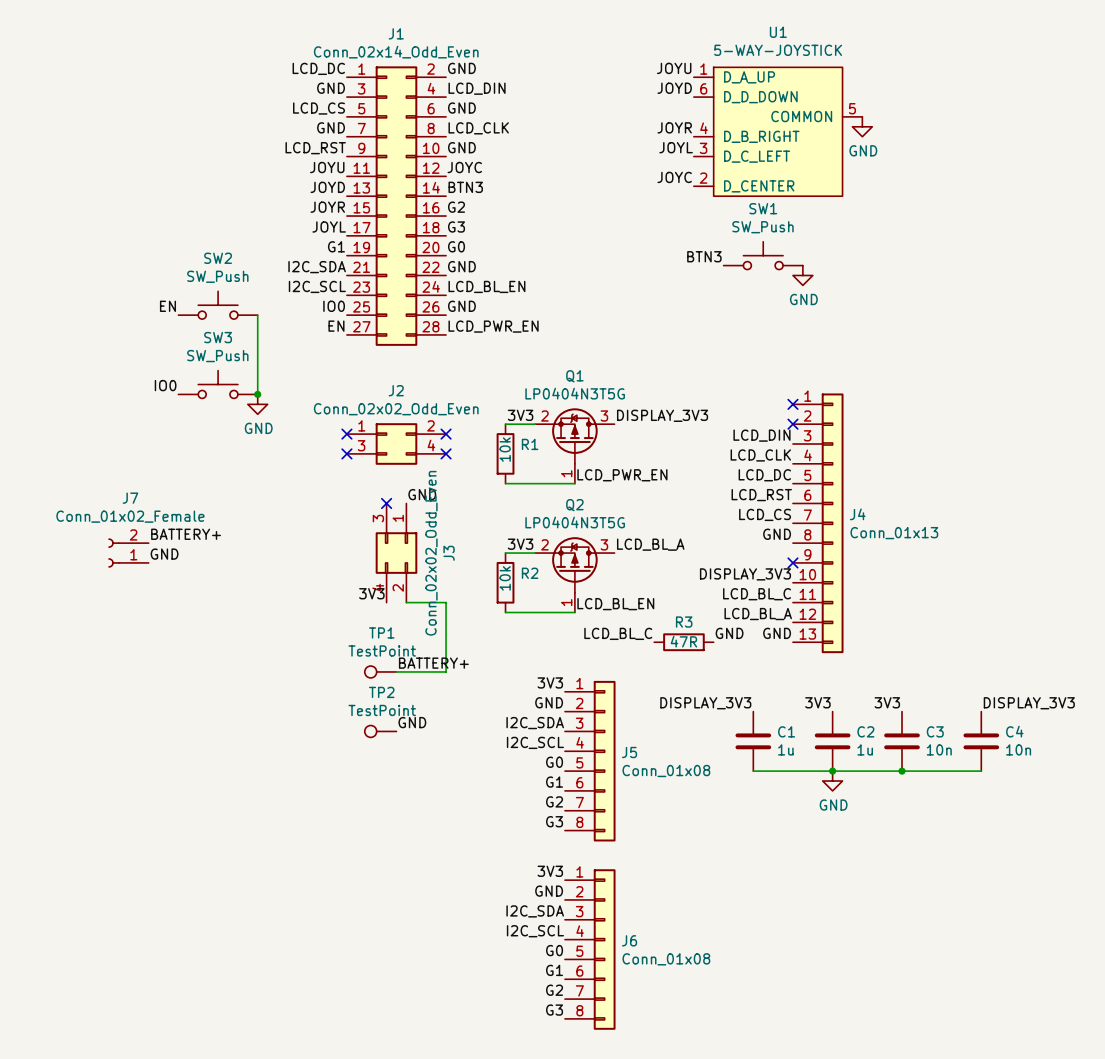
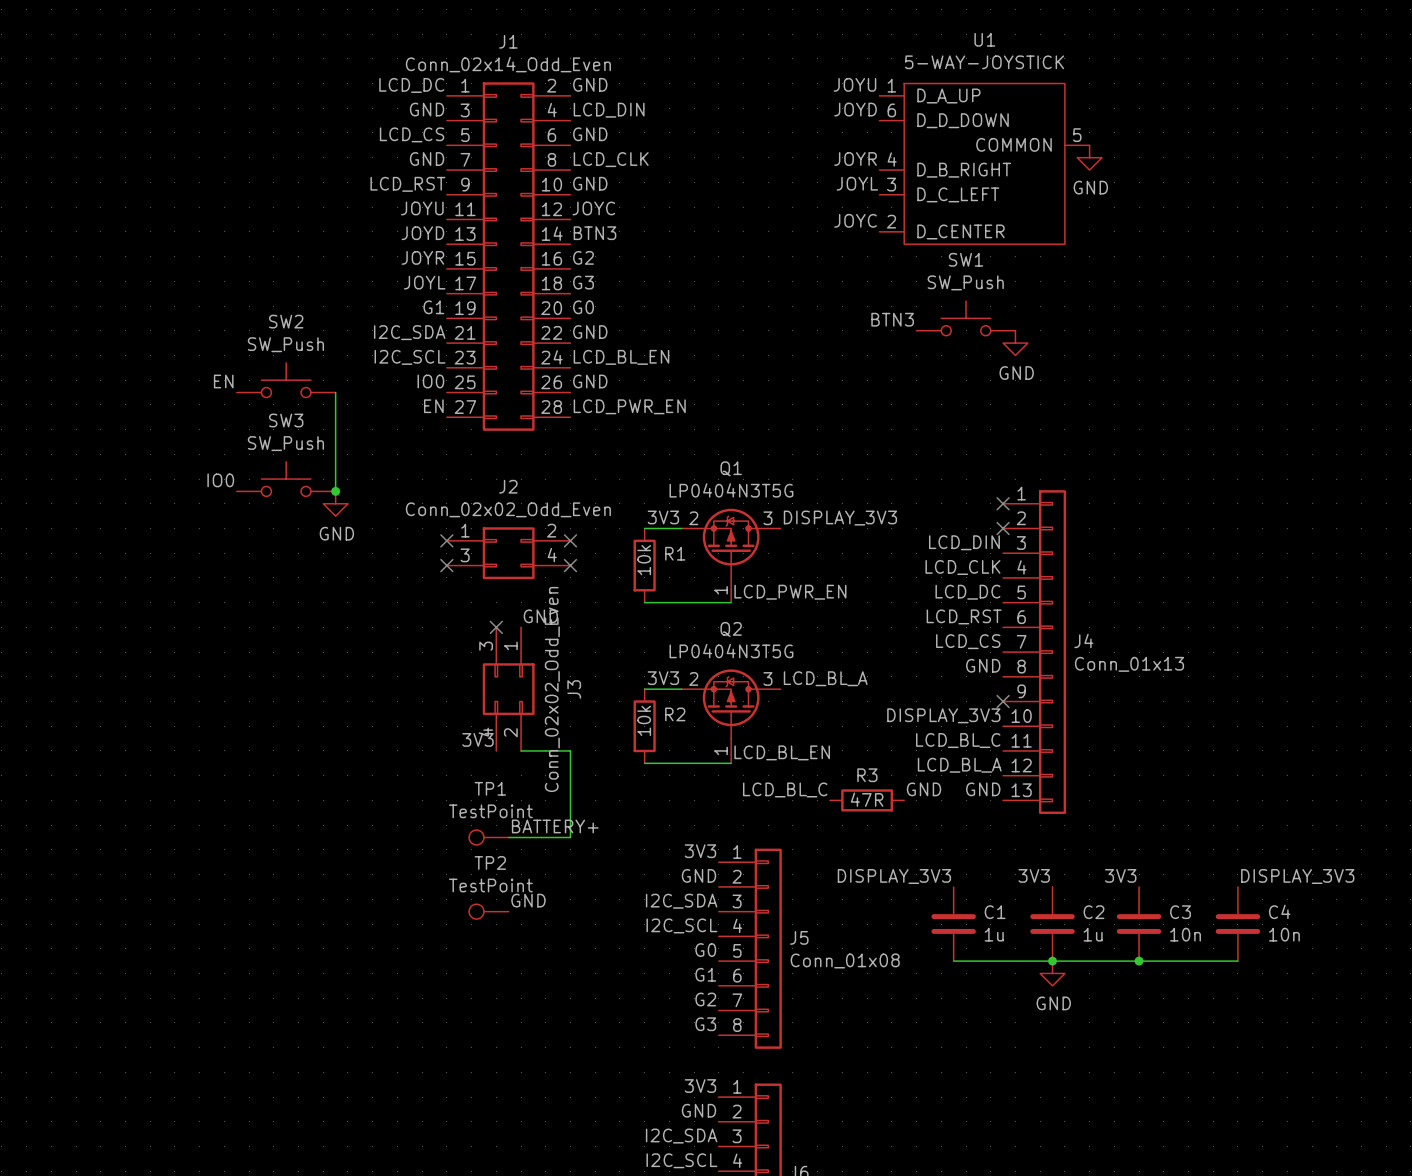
label: BATTERY+ (186, 534) -> none
J7: Conn_01x02_Female (128, 553) -> none
label: GND (164, 554) -> none

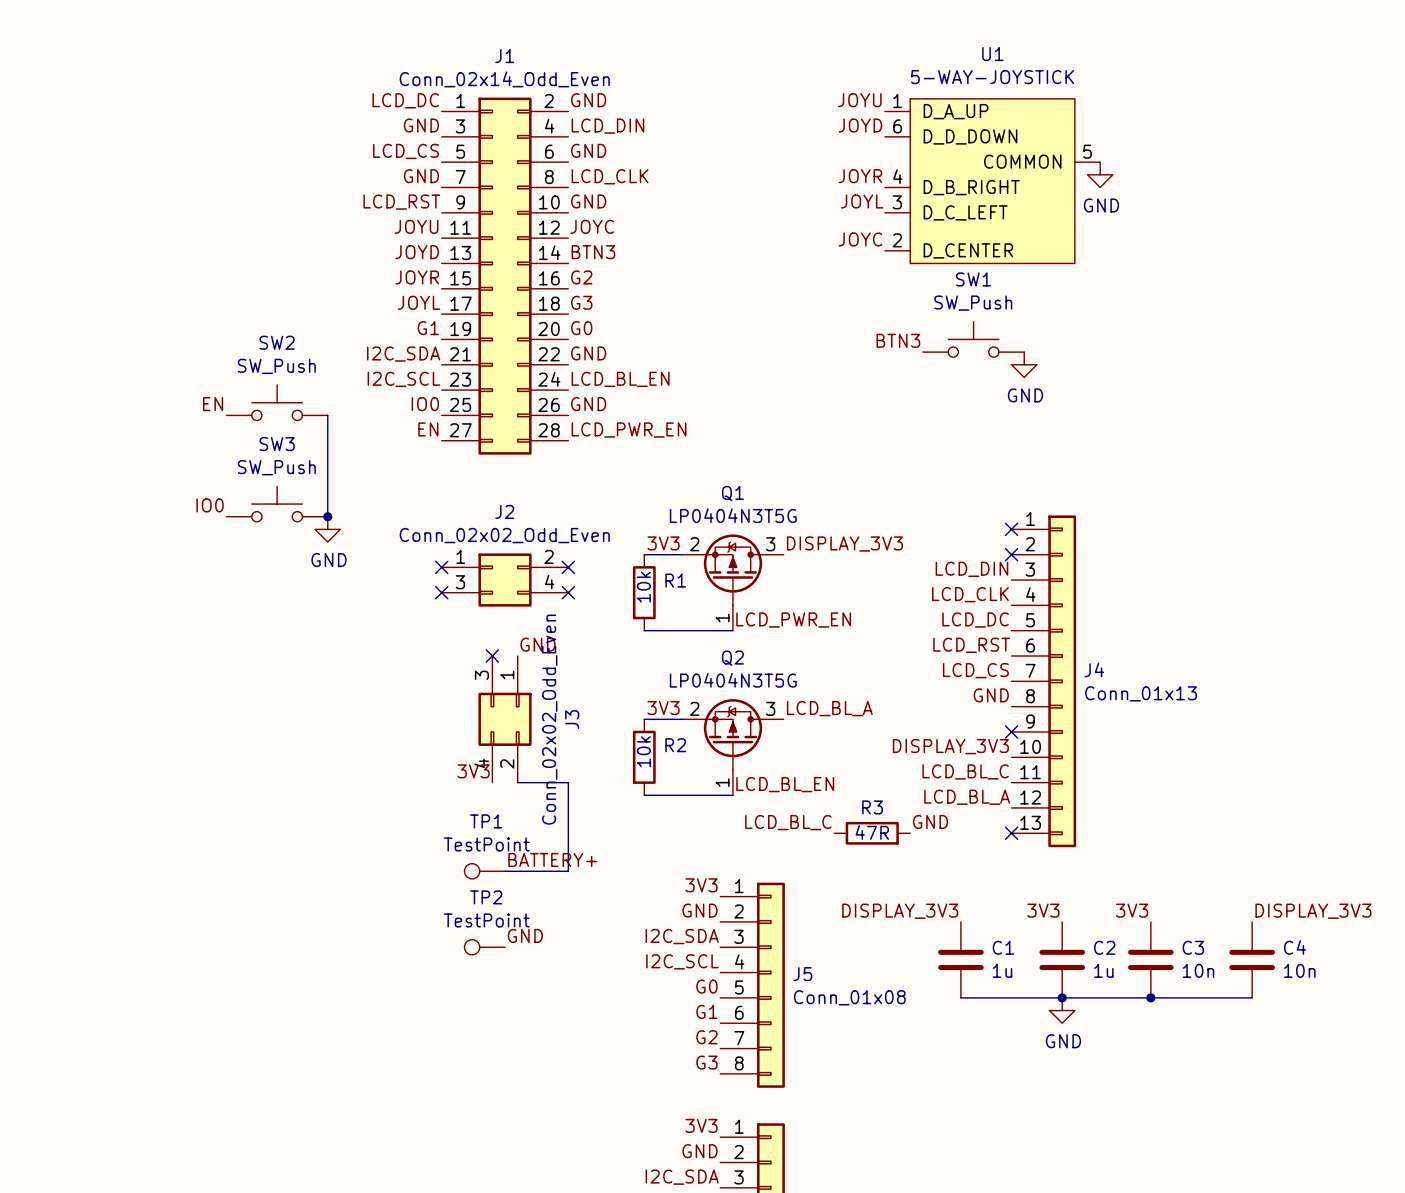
label: GND (983, 789) -> none
no-connect mark: none -> (1011, 833)

